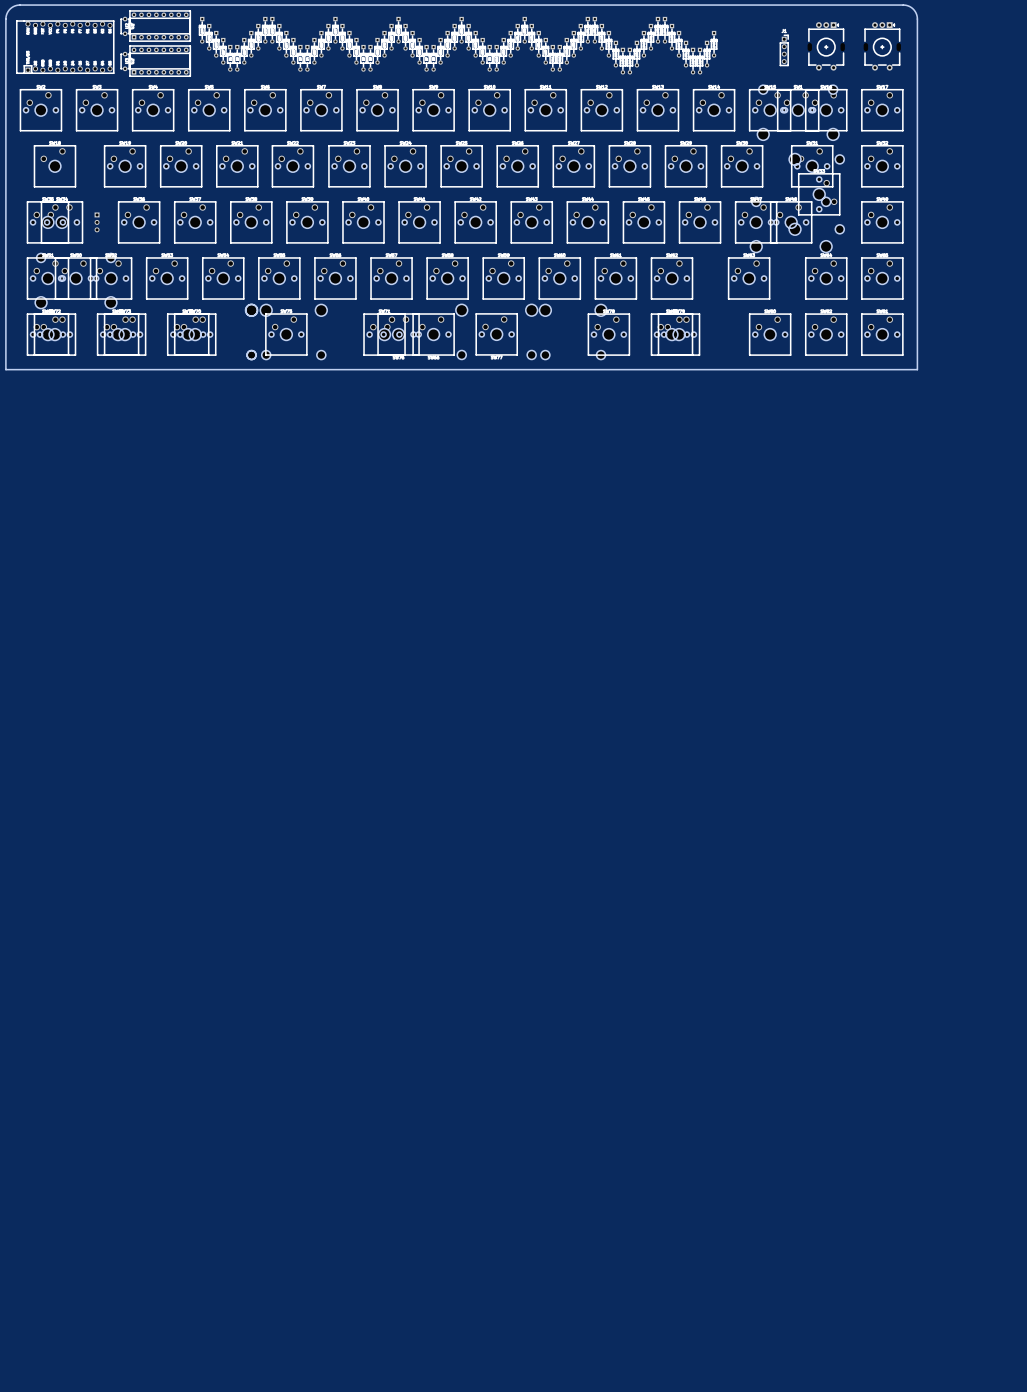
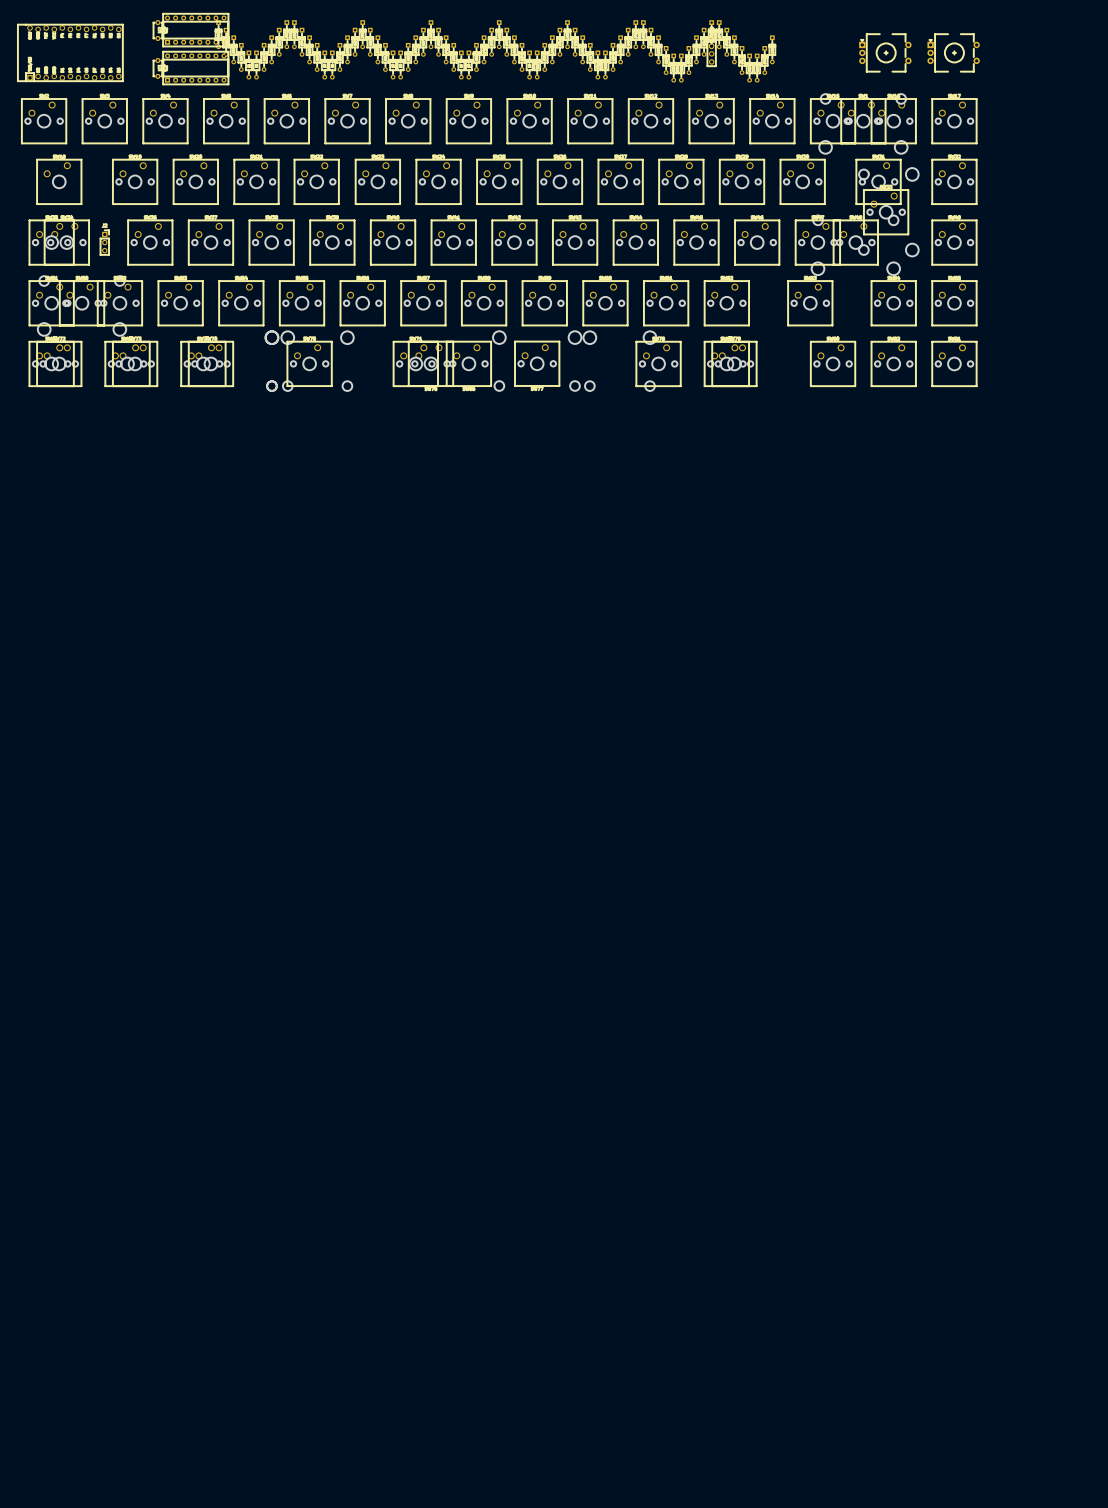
board edge: (19, 5) (908, 5) (915, 11) (917, 19) (917, 369) (5, 369) (5, 19) (10, 9) (19, 5) -> none
part position: (125, 26) -> (157, 30)
part position: (160, 26) -> (195, 30)
part rotation: 0° (826, 46) -> 90° counterclockwise (885, 52)
part rotation: 0° (882, 46) -> 90° counterclockwise (953, 52)
part position: (784, 50) -> (711, 49)
part position: (125, 61) -> (157, 68)
part position: (160, 61) -> (195, 68)
part footprint: [789, 153, 845, 236] -> [859, 168, 919, 257]
part side: bottom (97, 222) -> top (104, 242)

